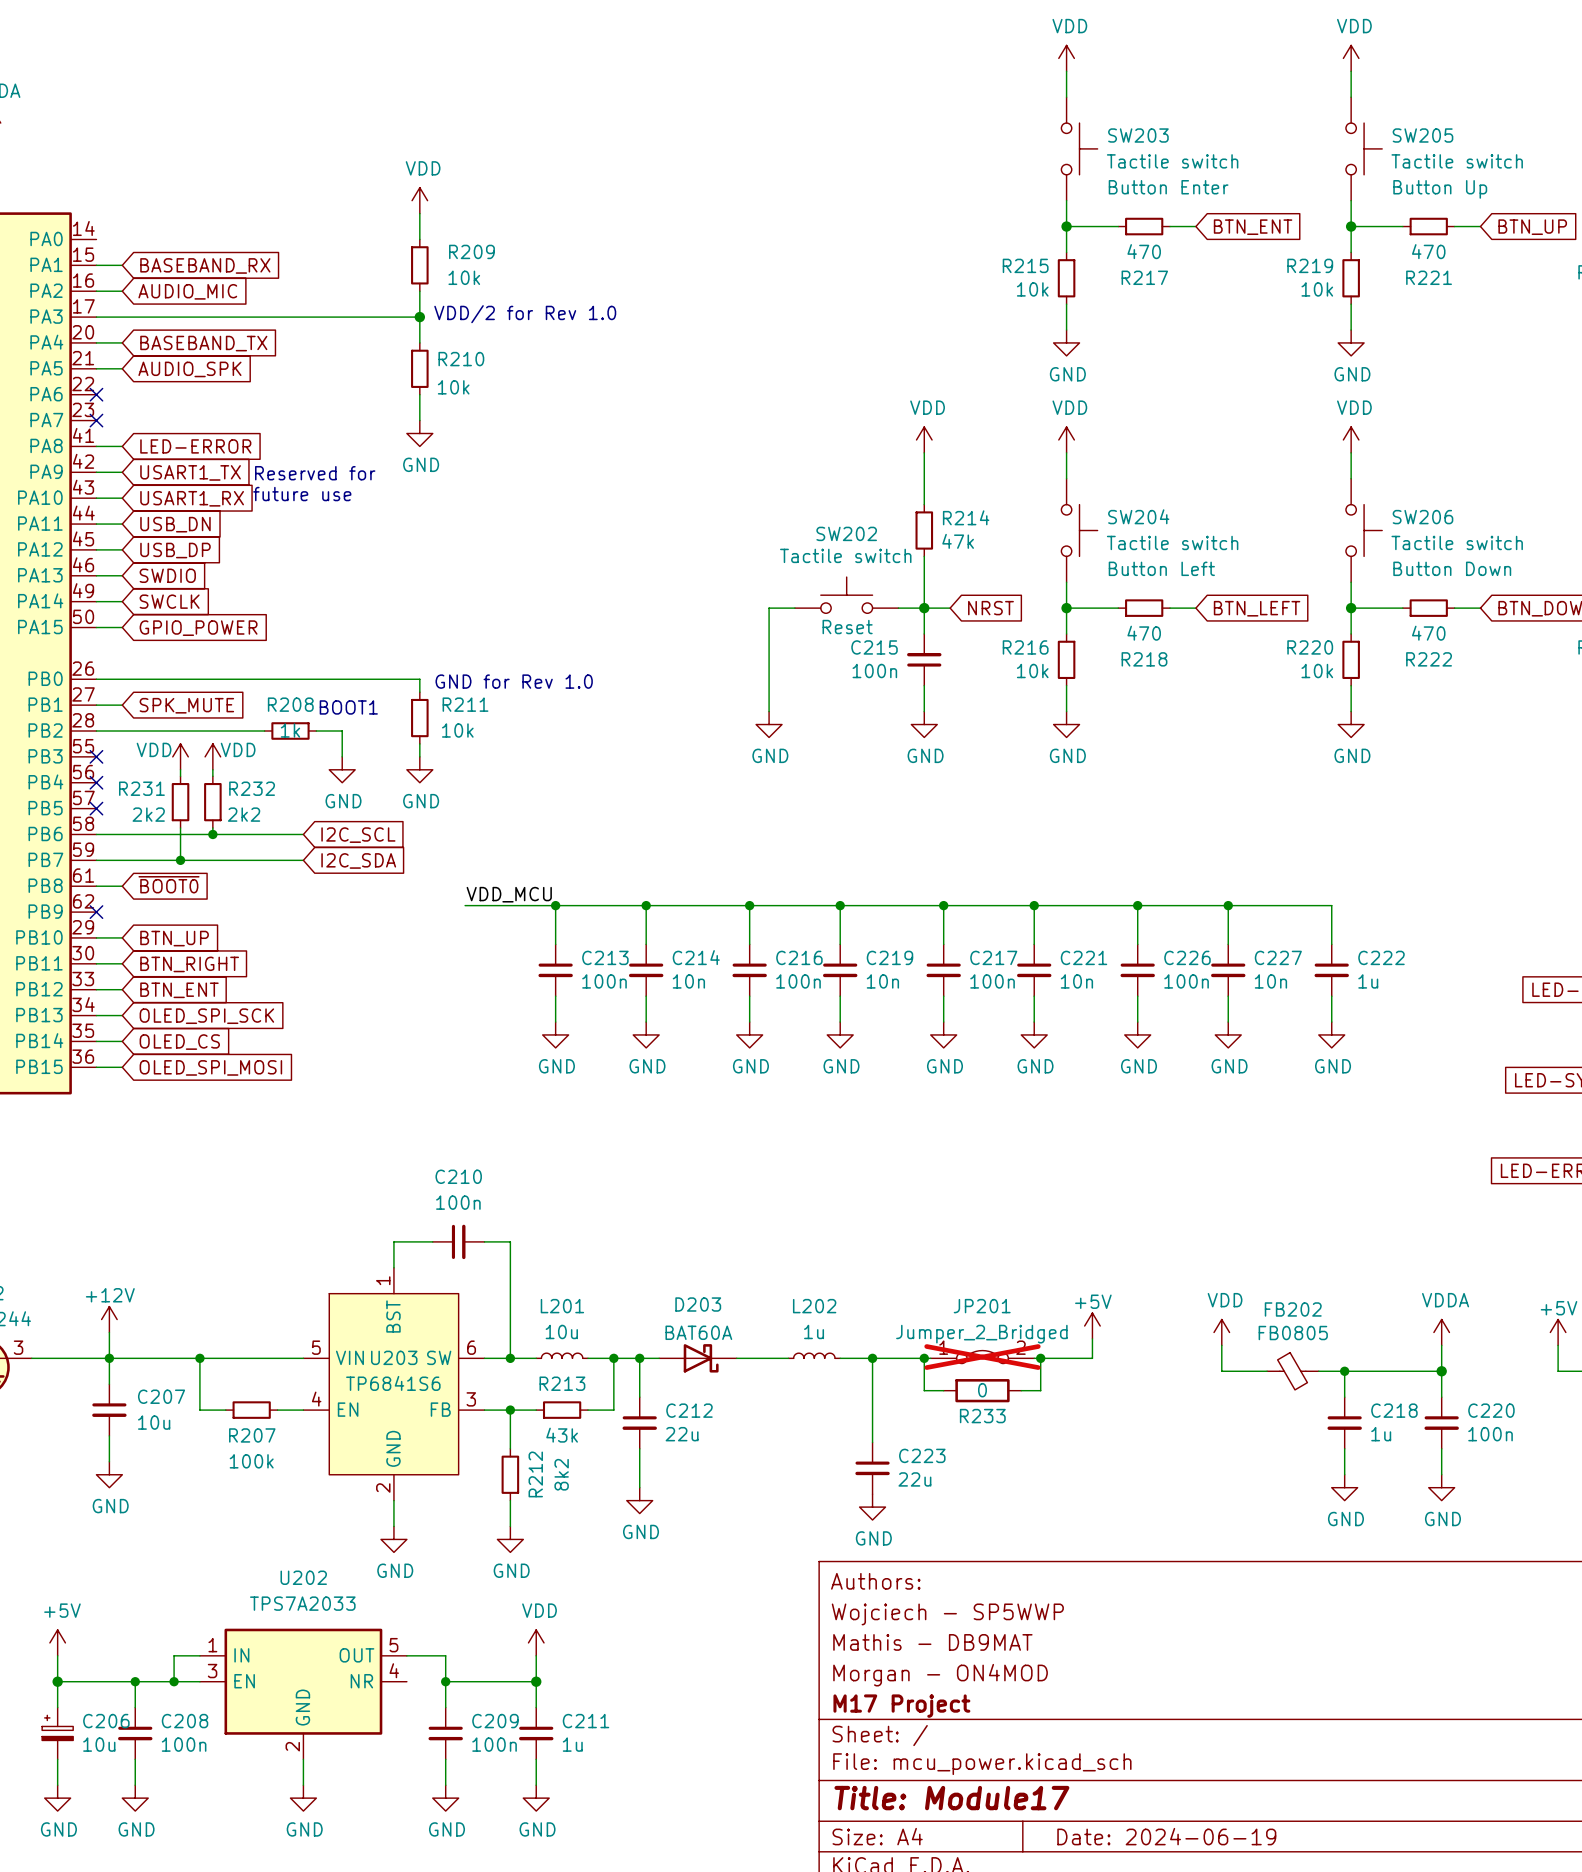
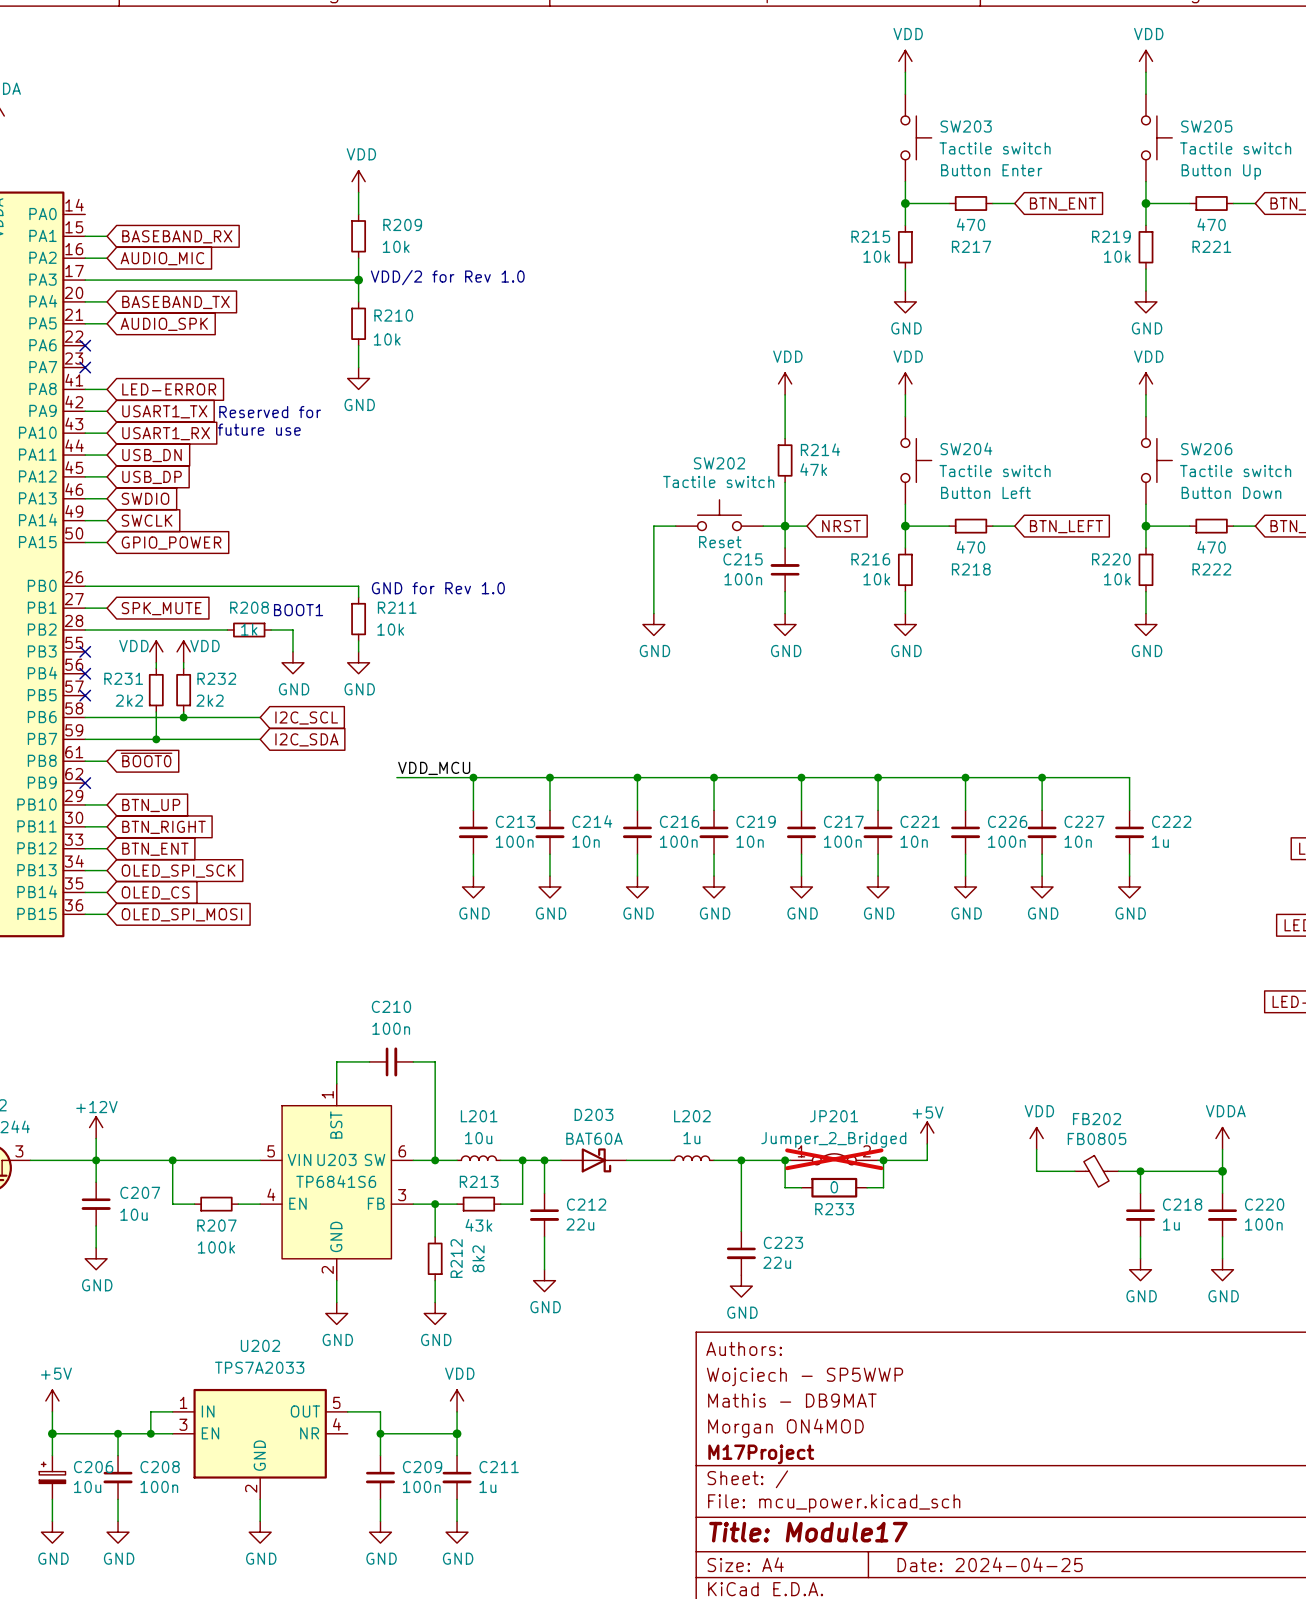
title block: Morgan - ON4MOD (940, 1675) -> Morgan ON4MOD (785, 1428)
title block: M17 Project (901, 1706) -> M17Project (761, 1454)
title block: Date: 2024-06-19 (1166, 1836) -> Date: 2024-04-25 (990, 1564)

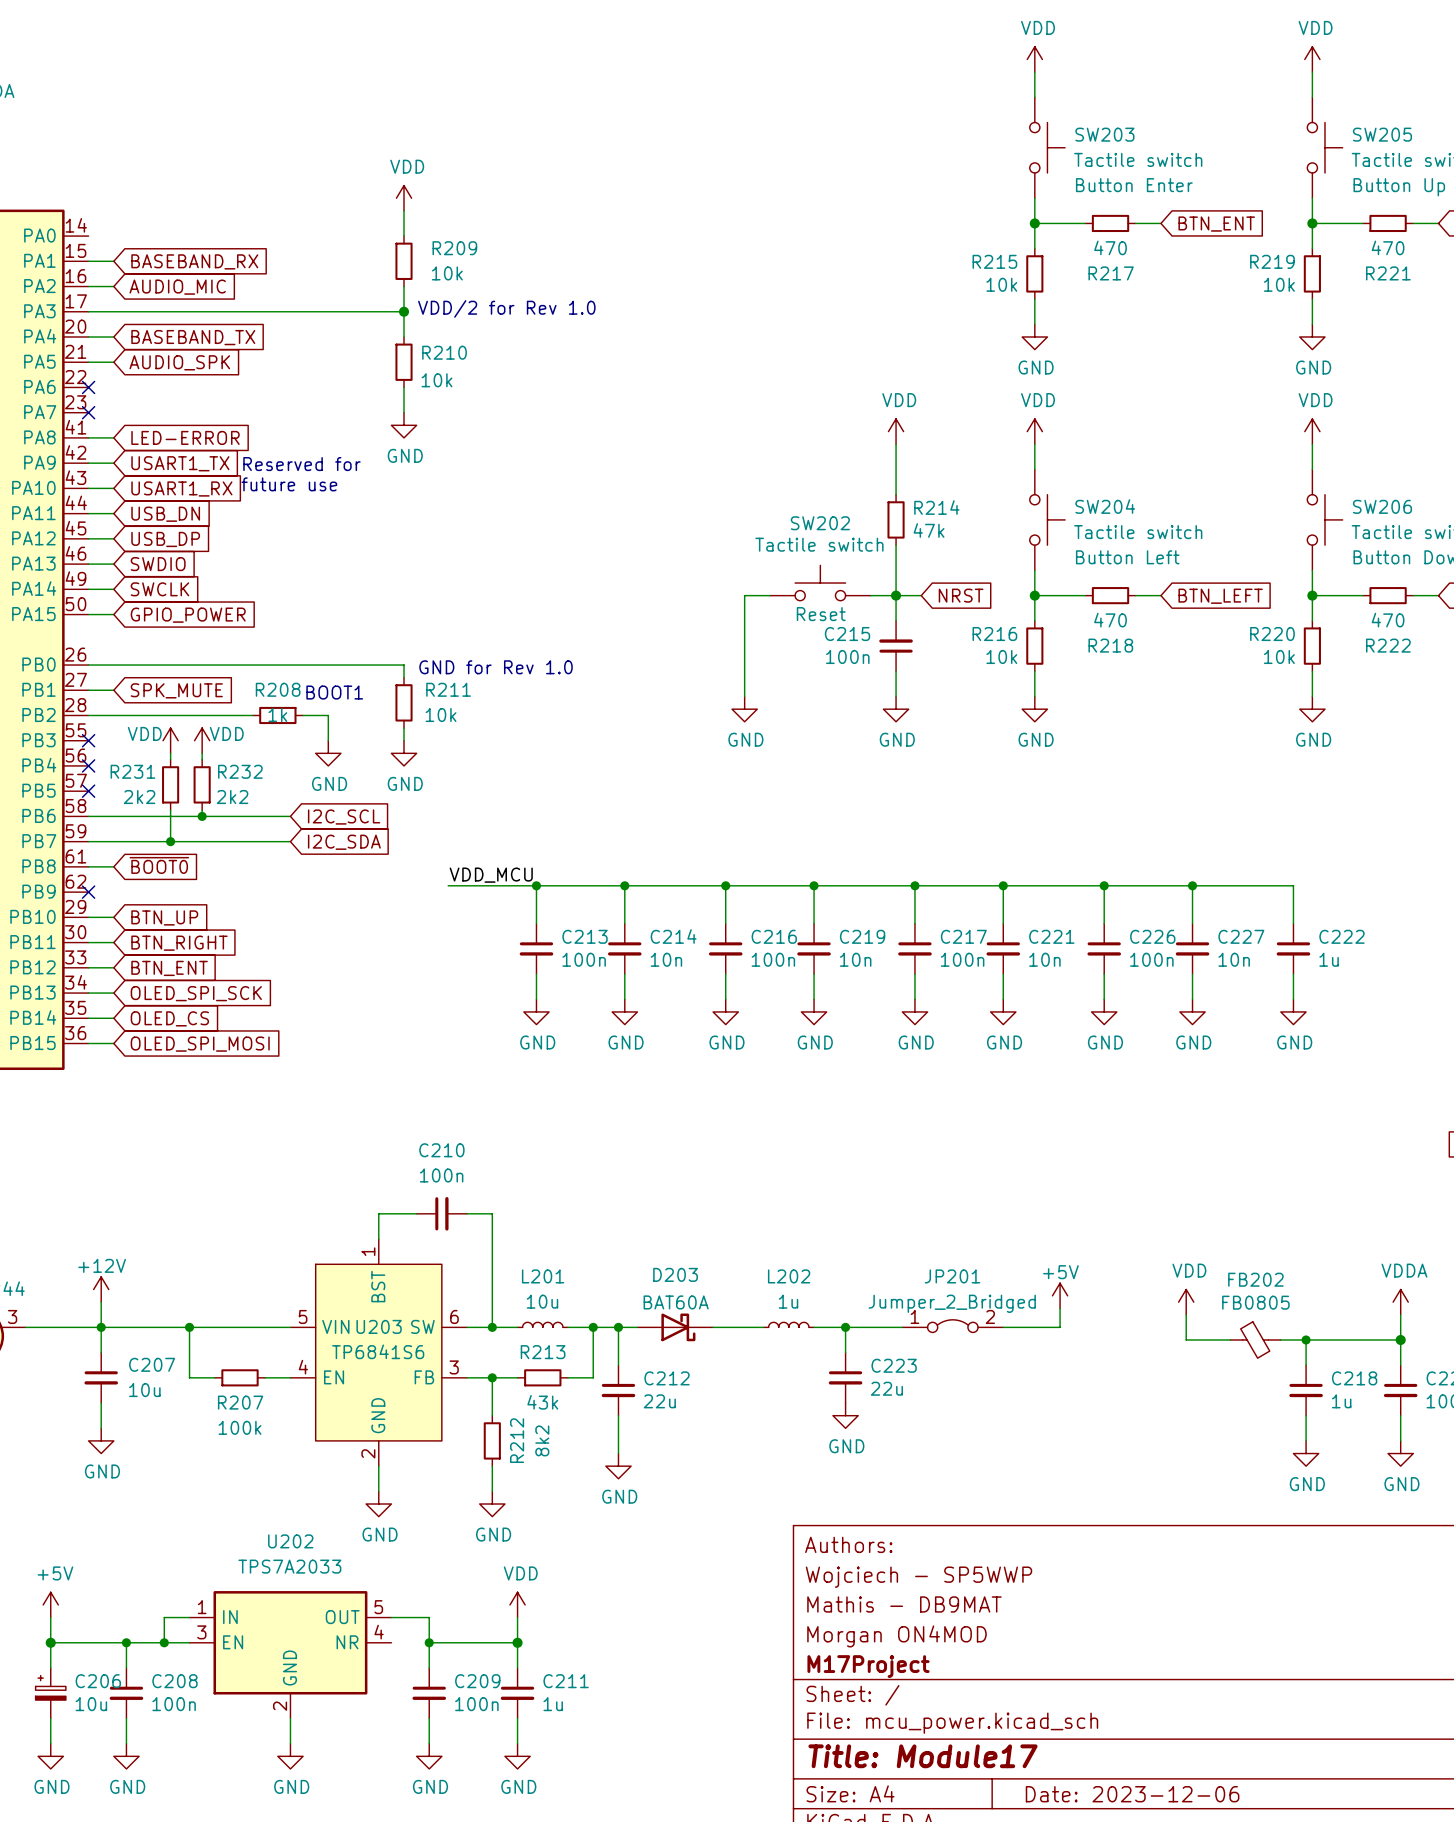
JP201 do-not-place cross: (834, 1159) -> none
wire: (785, 1160) (785, 1187) (801, 1187) -> none
junction: (785, 1160) -> none
wire: (883, 1160) (883, 1187) (867, 1187) -> none
junction: (883, 1160) -> none
R233: 0 (834, 1187) -> none
C223 position: (741, 1253) -> (845, 1377)
power symbol position: GND (741, 1286) -> GND (845, 1415)
title block: Date: 2024-04-25 (990, 1564) -> Date: 2023-12-06 (1132, 1794)

